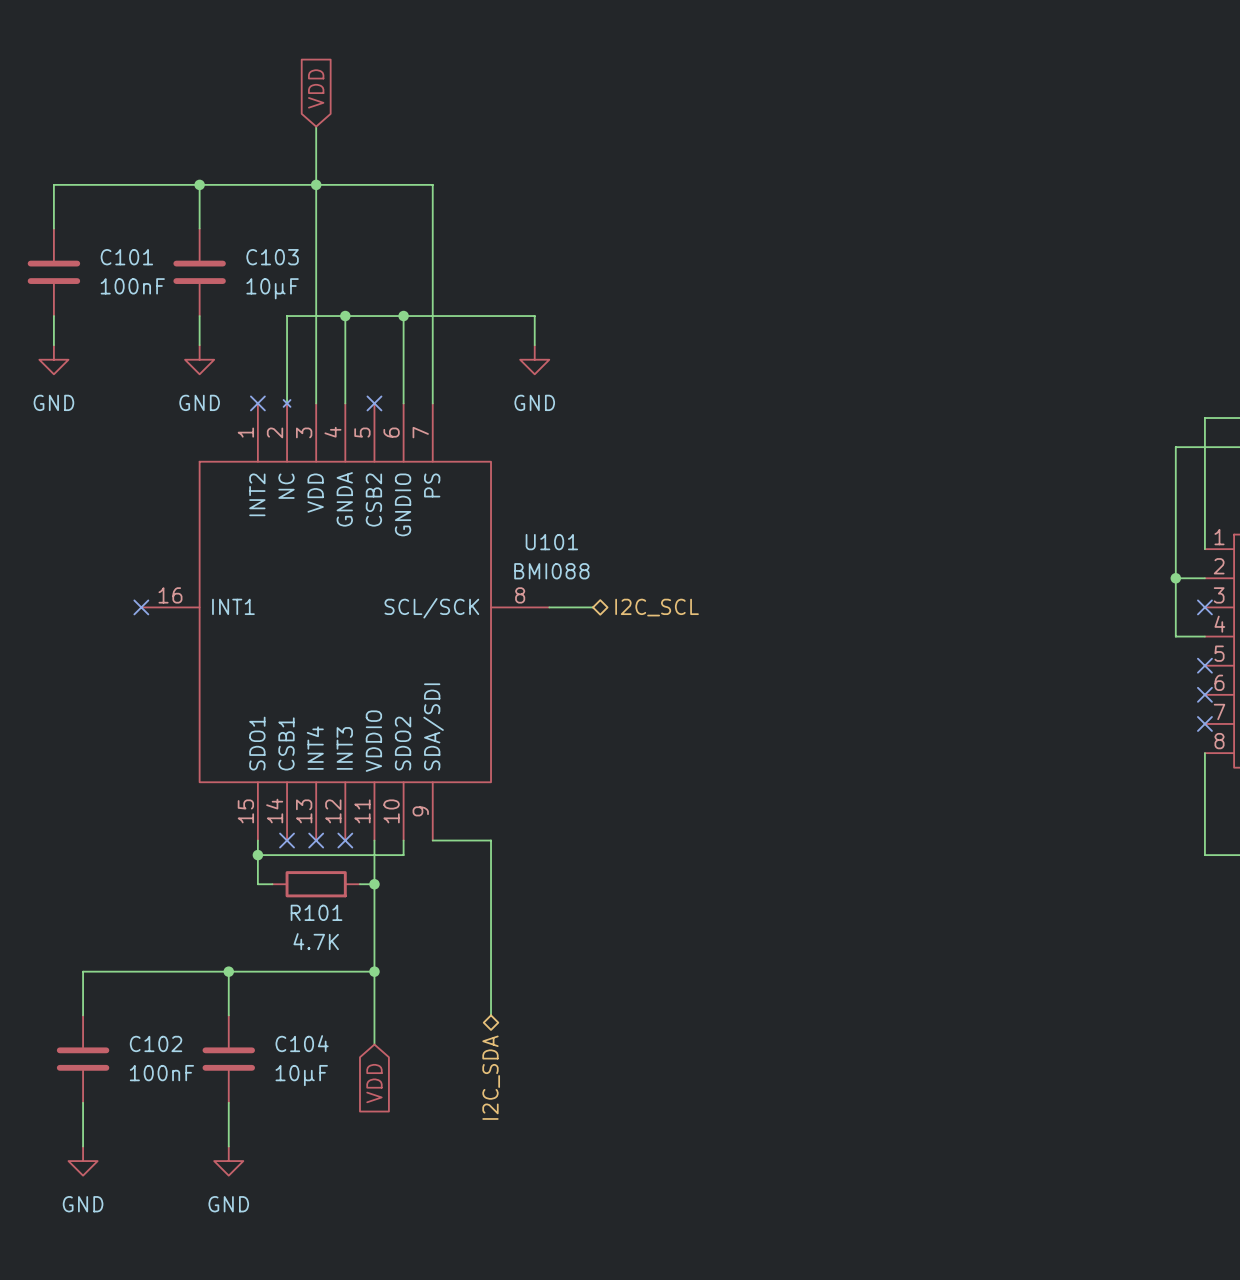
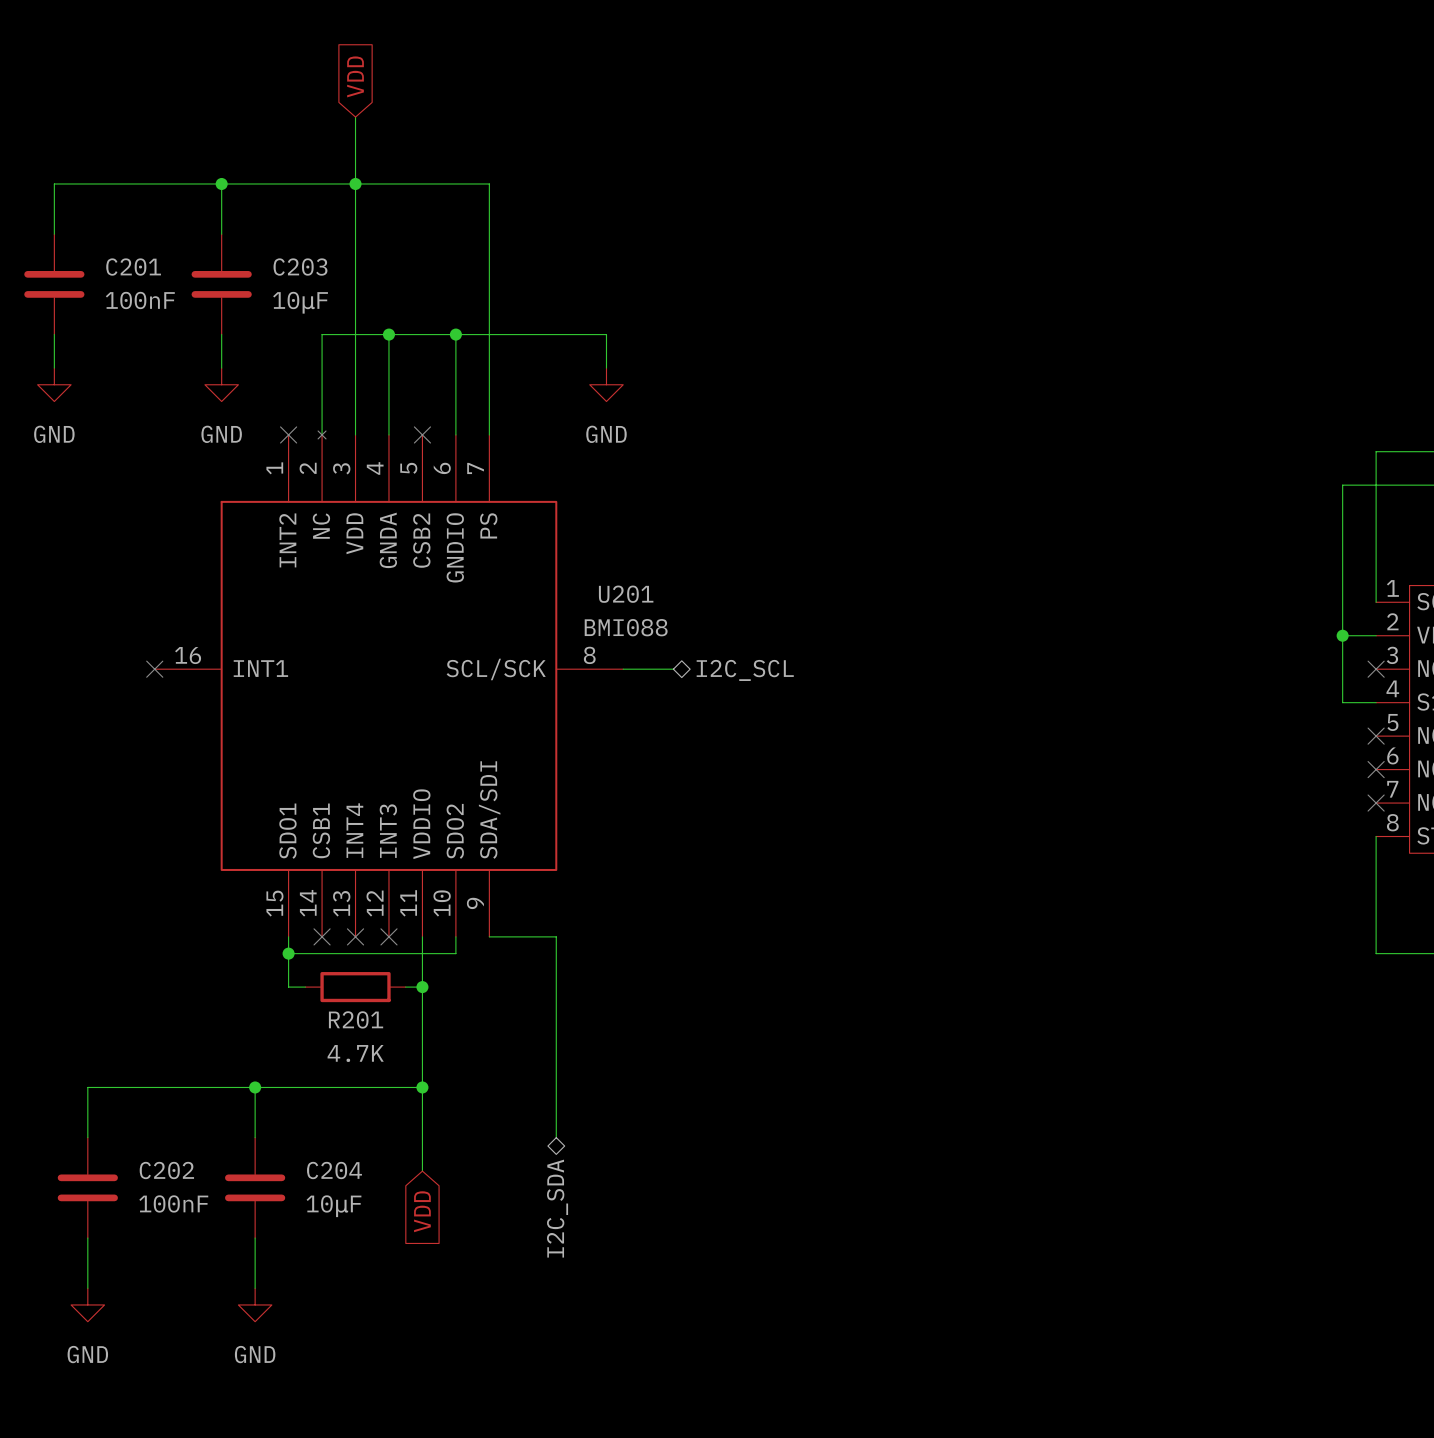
C101 name: C101 (126, 257) -> C201 (133, 267)
C103 name: C103 (272, 257) -> C203 (300, 267)
U101 name: U101 (551, 542) -> U201 (626, 594)
R101 name: R101 (316, 912) -> R201 (356, 1019)
C102 name: C102 (156, 1043) -> C202 (166, 1170)
C104 name: C104 (302, 1043) -> C204 (334, 1170)

